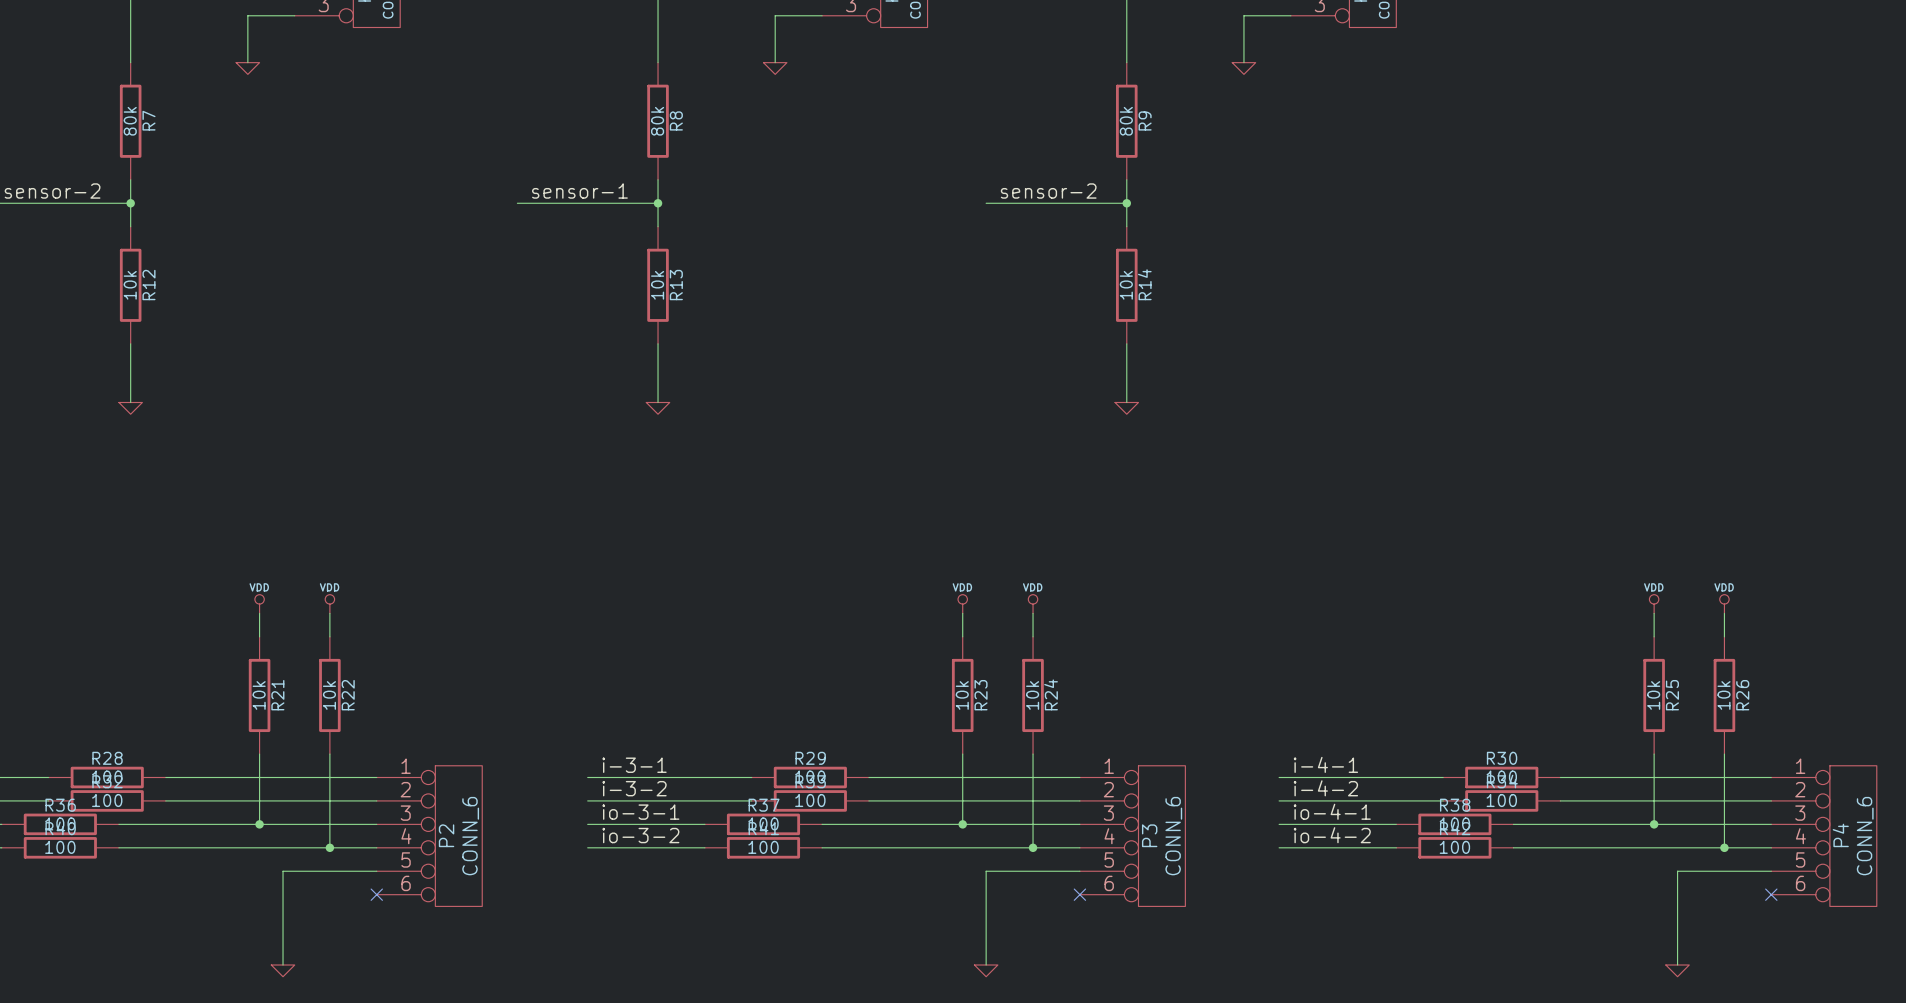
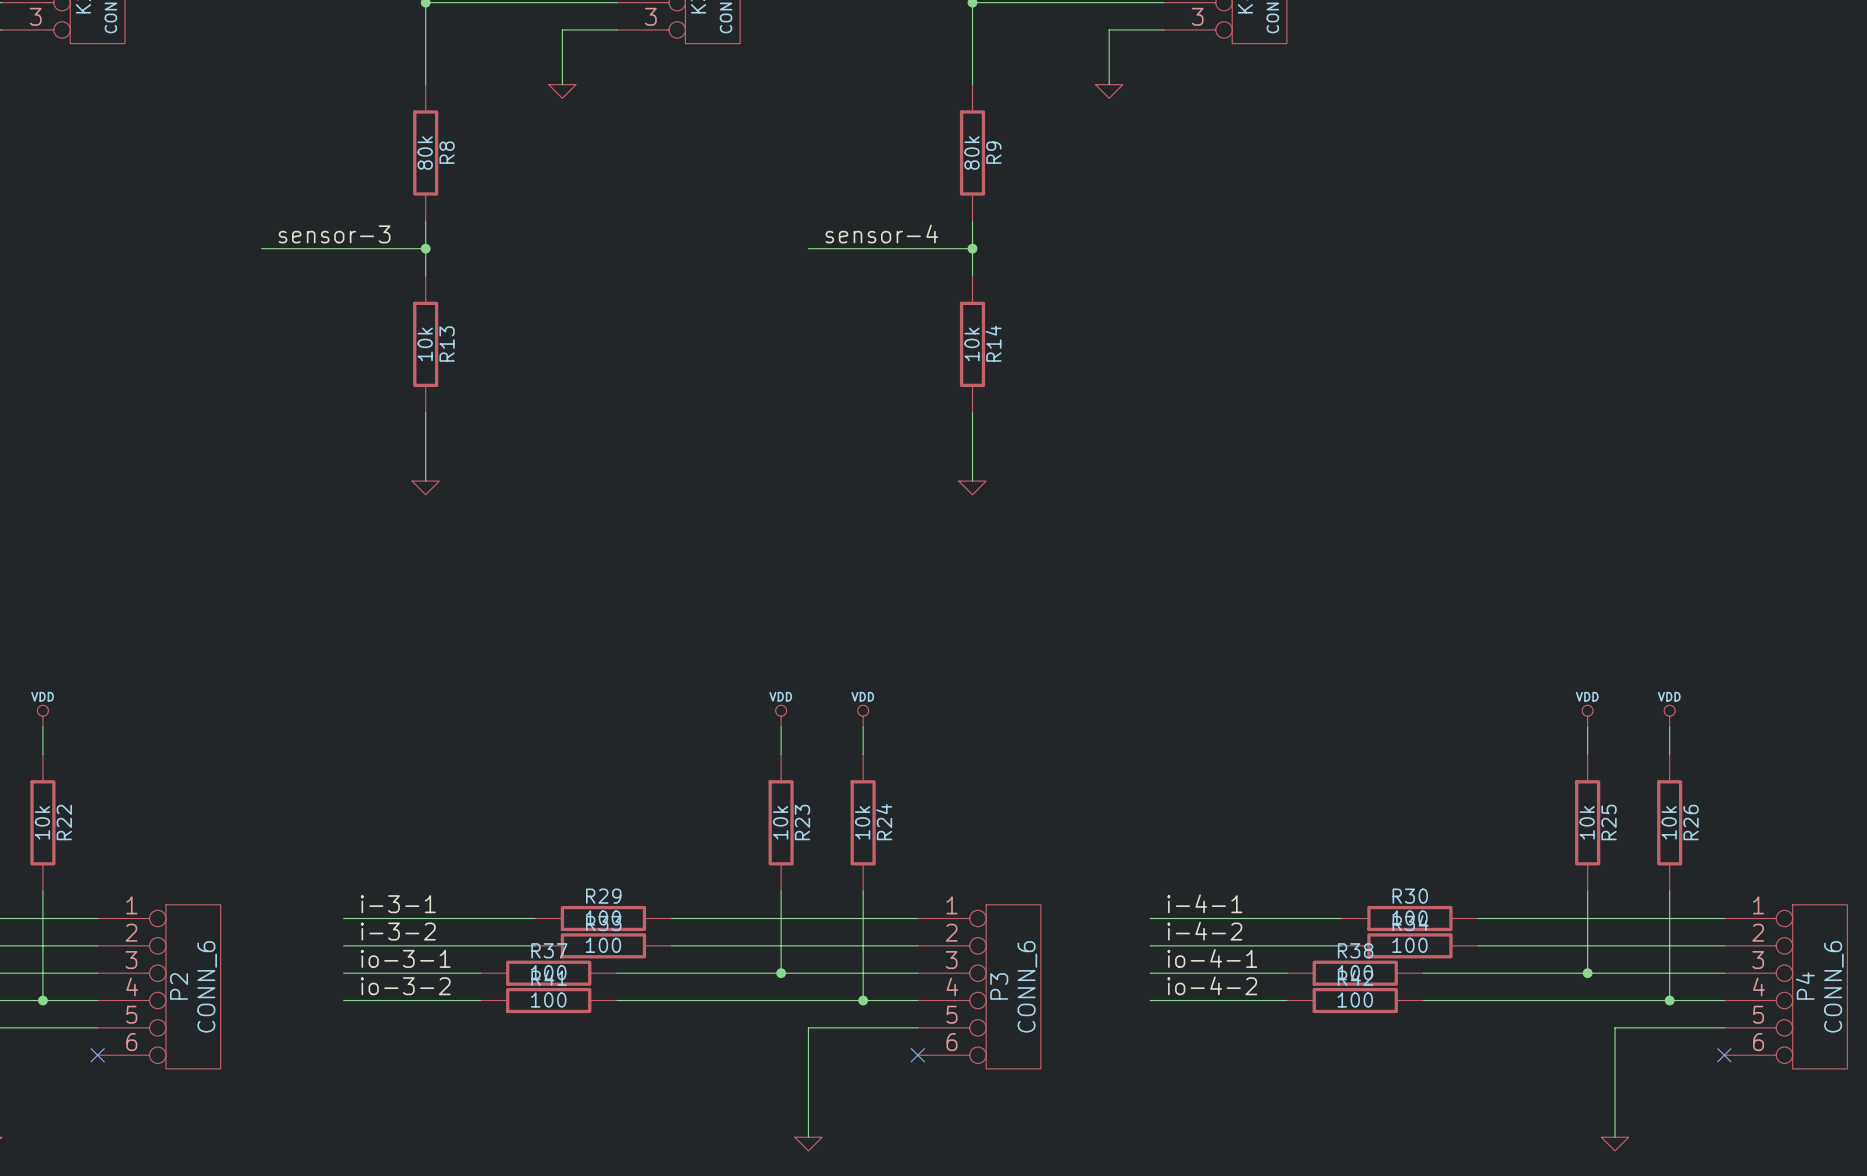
label: sensor-1 (579, 191) -> sensor-3 (334, 234)
label: sensor-2 (1048, 191) -> sensor-4 (881, 233)

